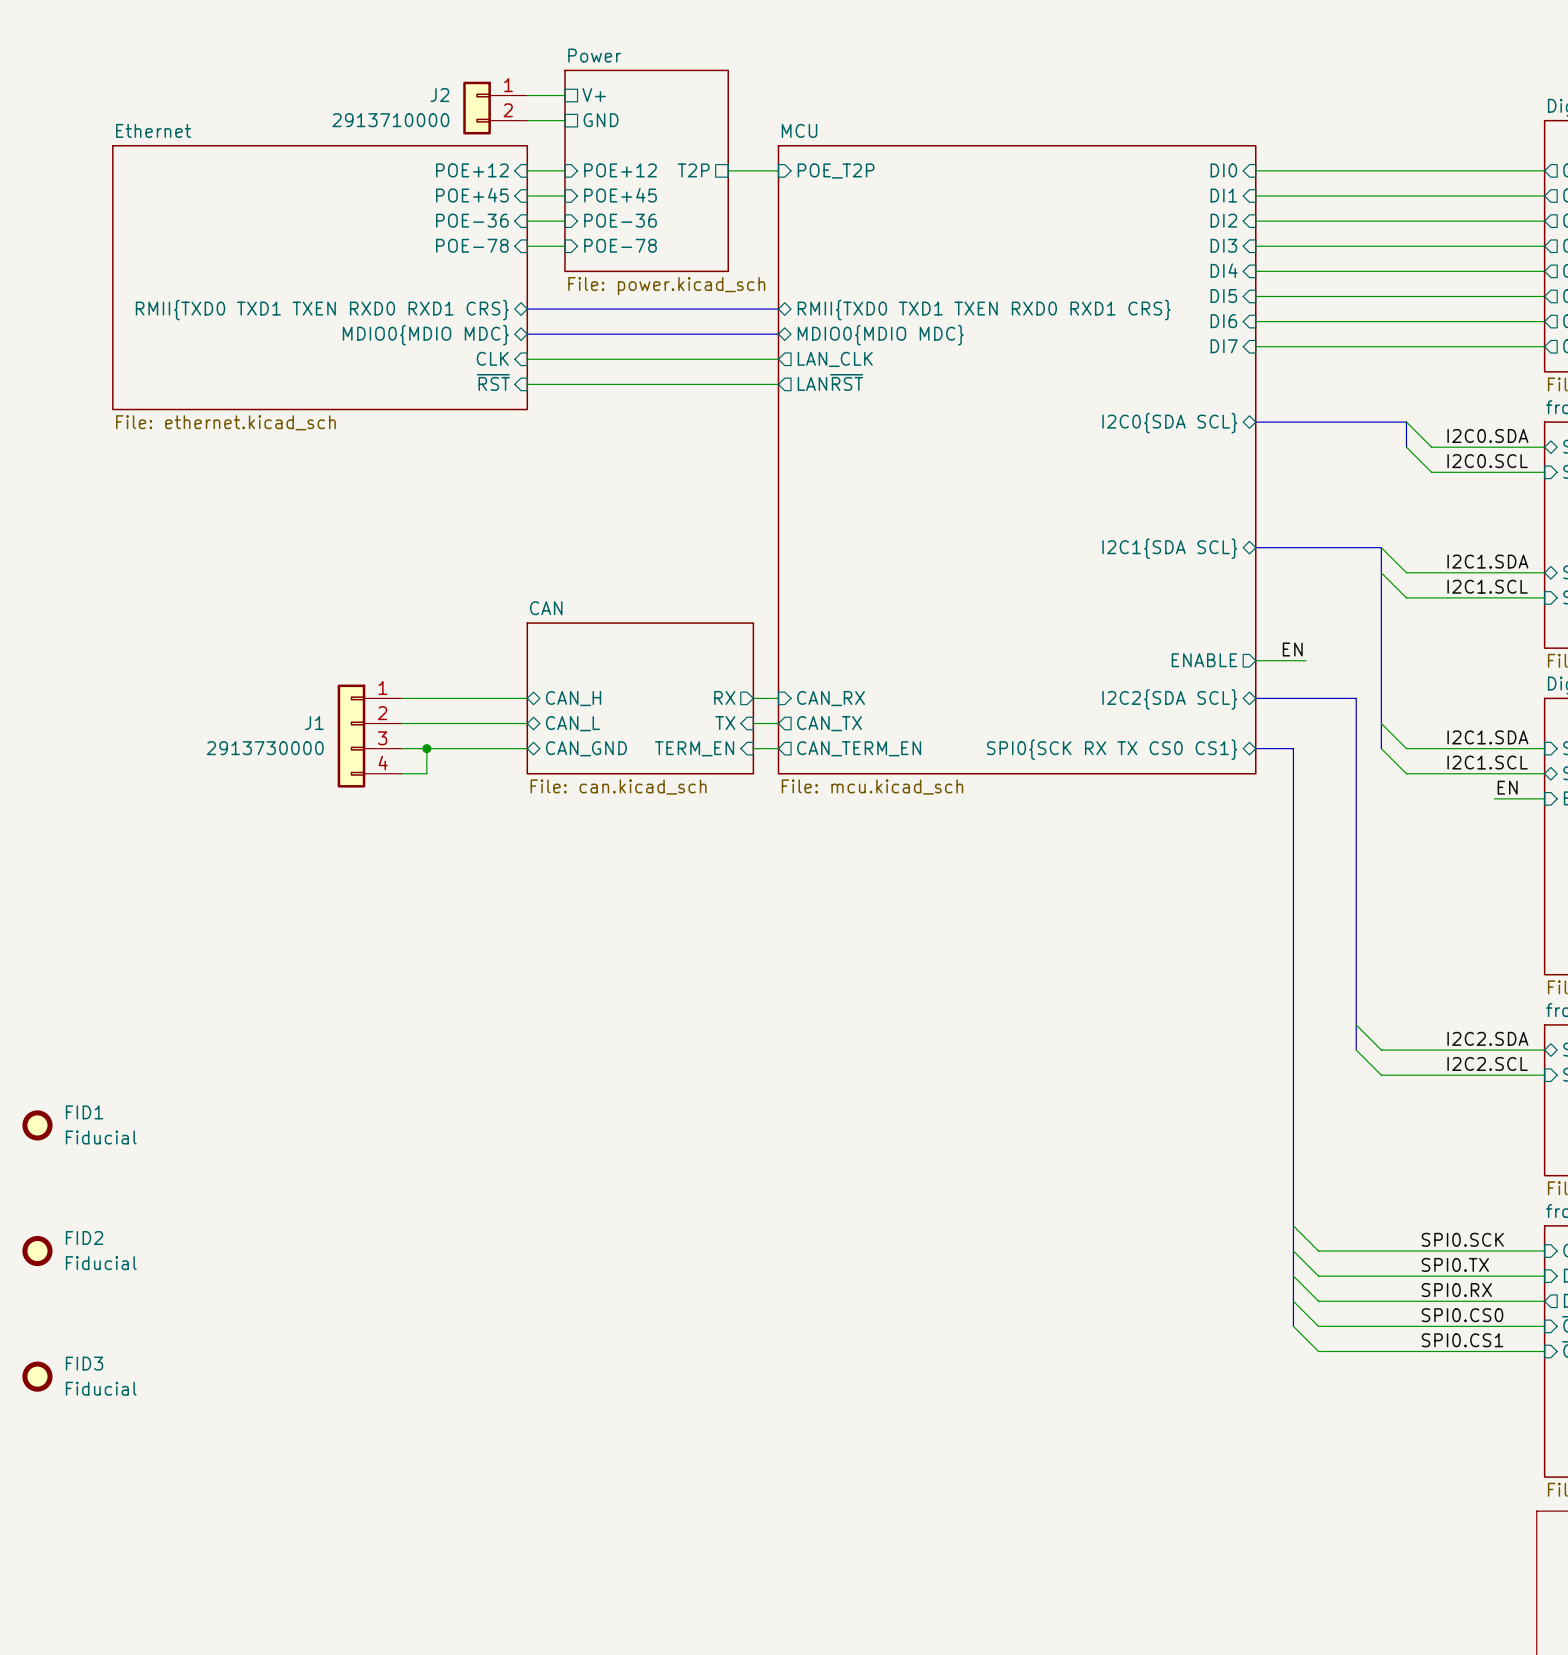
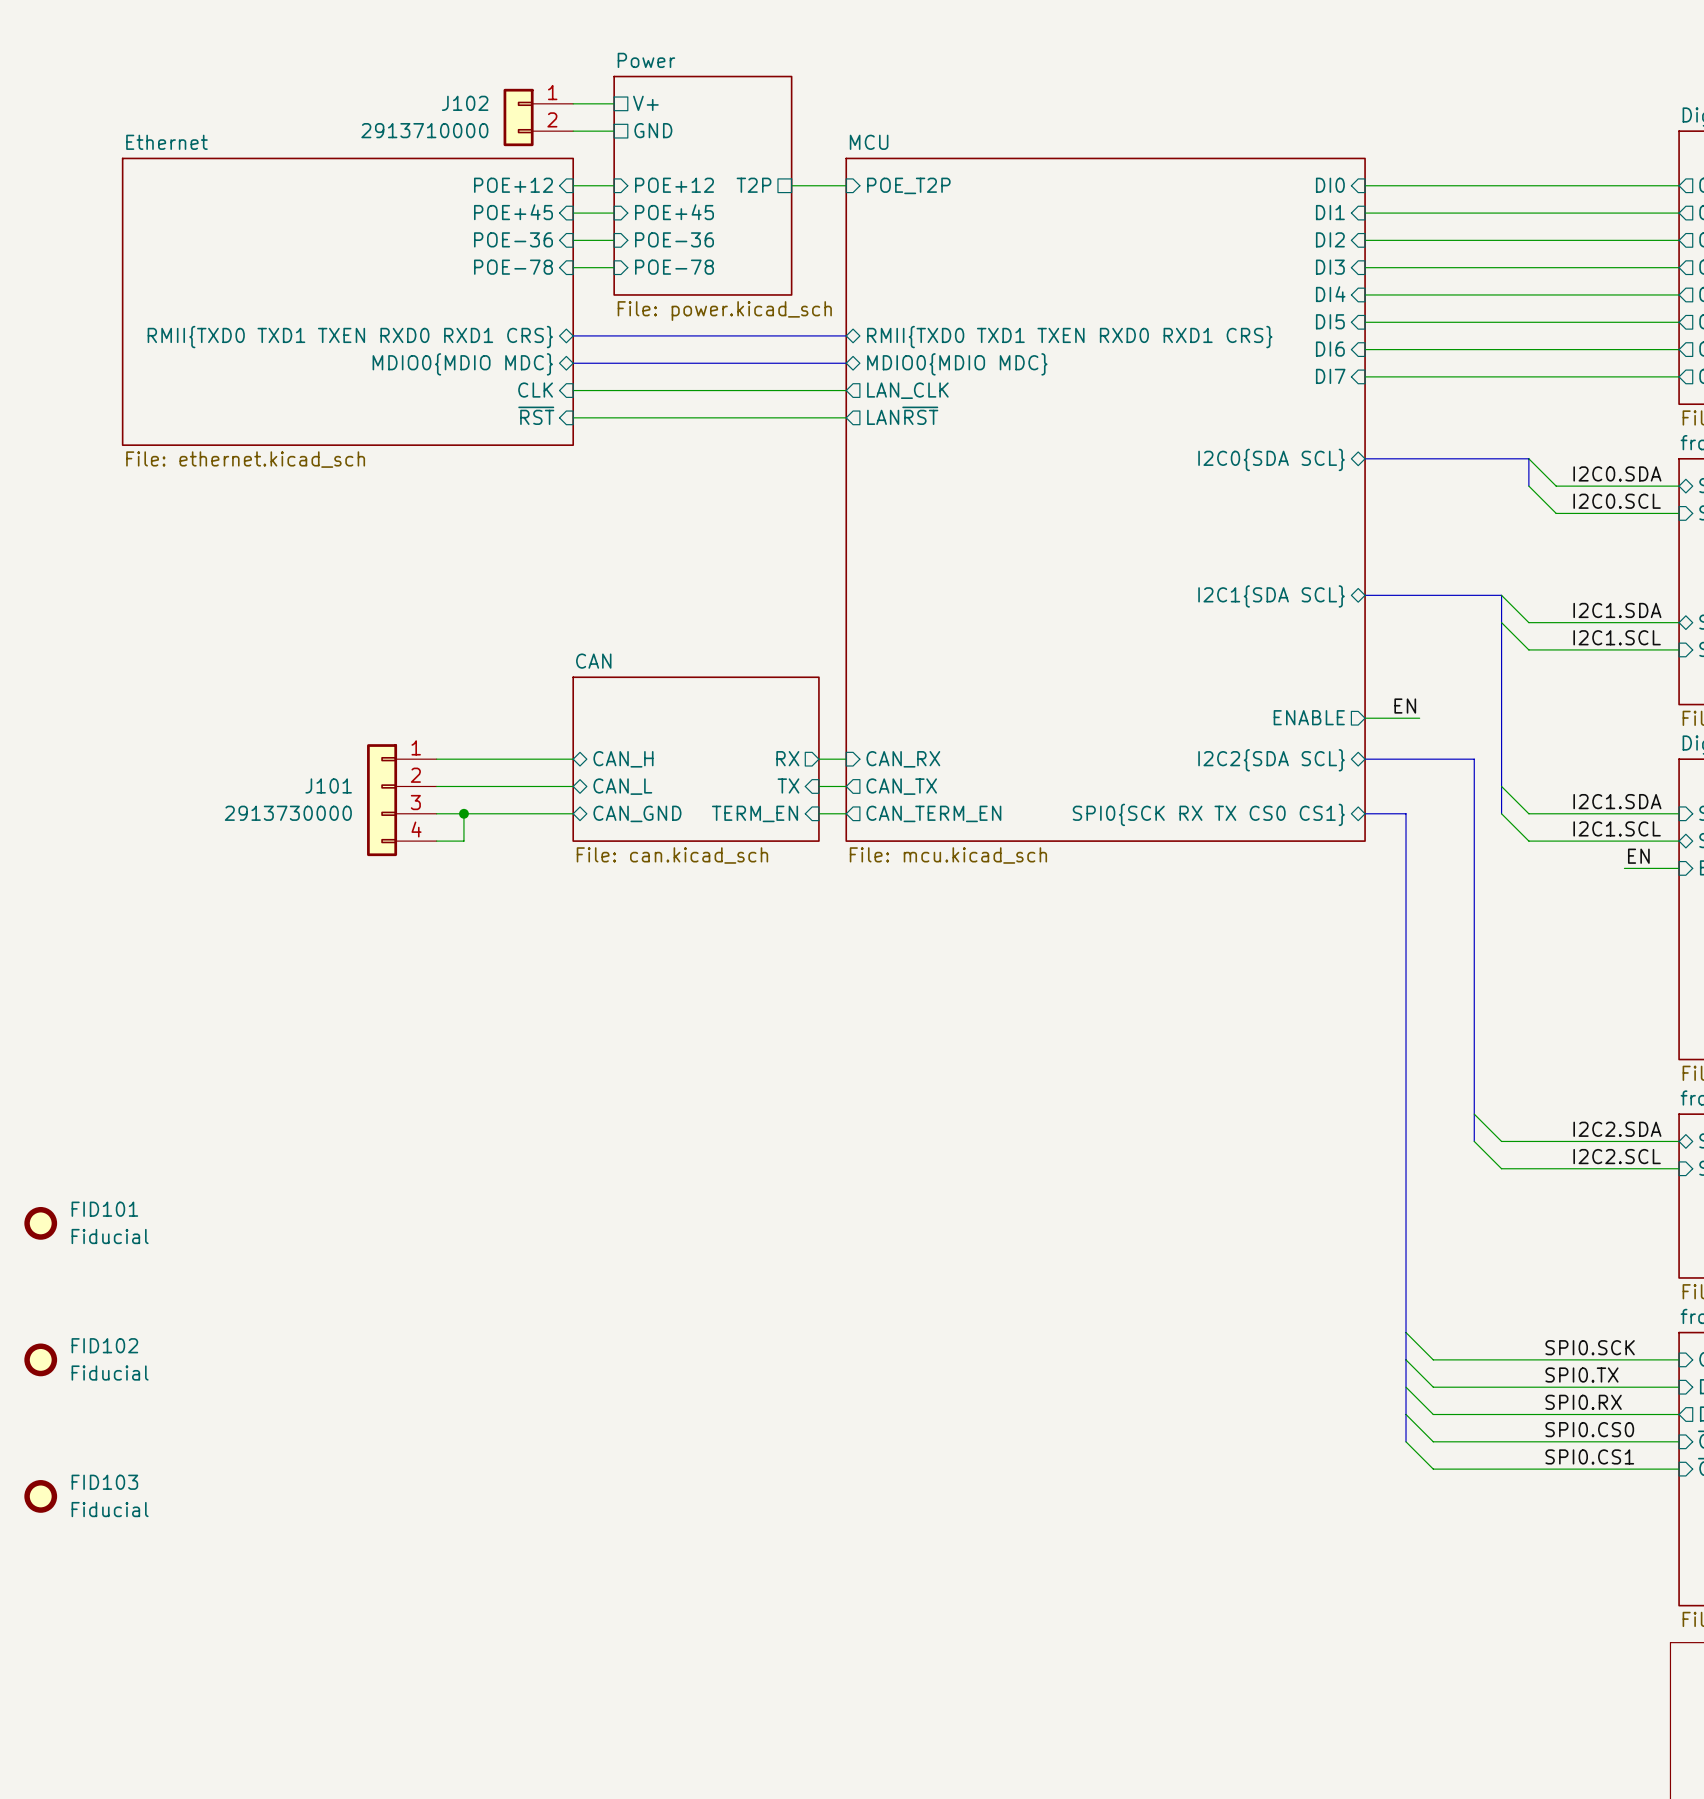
J2 name: J2 (439, 95) -> J102 (465, 103)
J1 name: J1 (314, 723) -> J101 (328, 785)
FID1 name: FID1 (84, 1112) -> FID101 (104, 1209)
FID2 name: FID2 (84, 1237) -> FID102 (104, 1345)
FID3 name: FID3 (84, 1363) -> FID103 (104, 1482)

